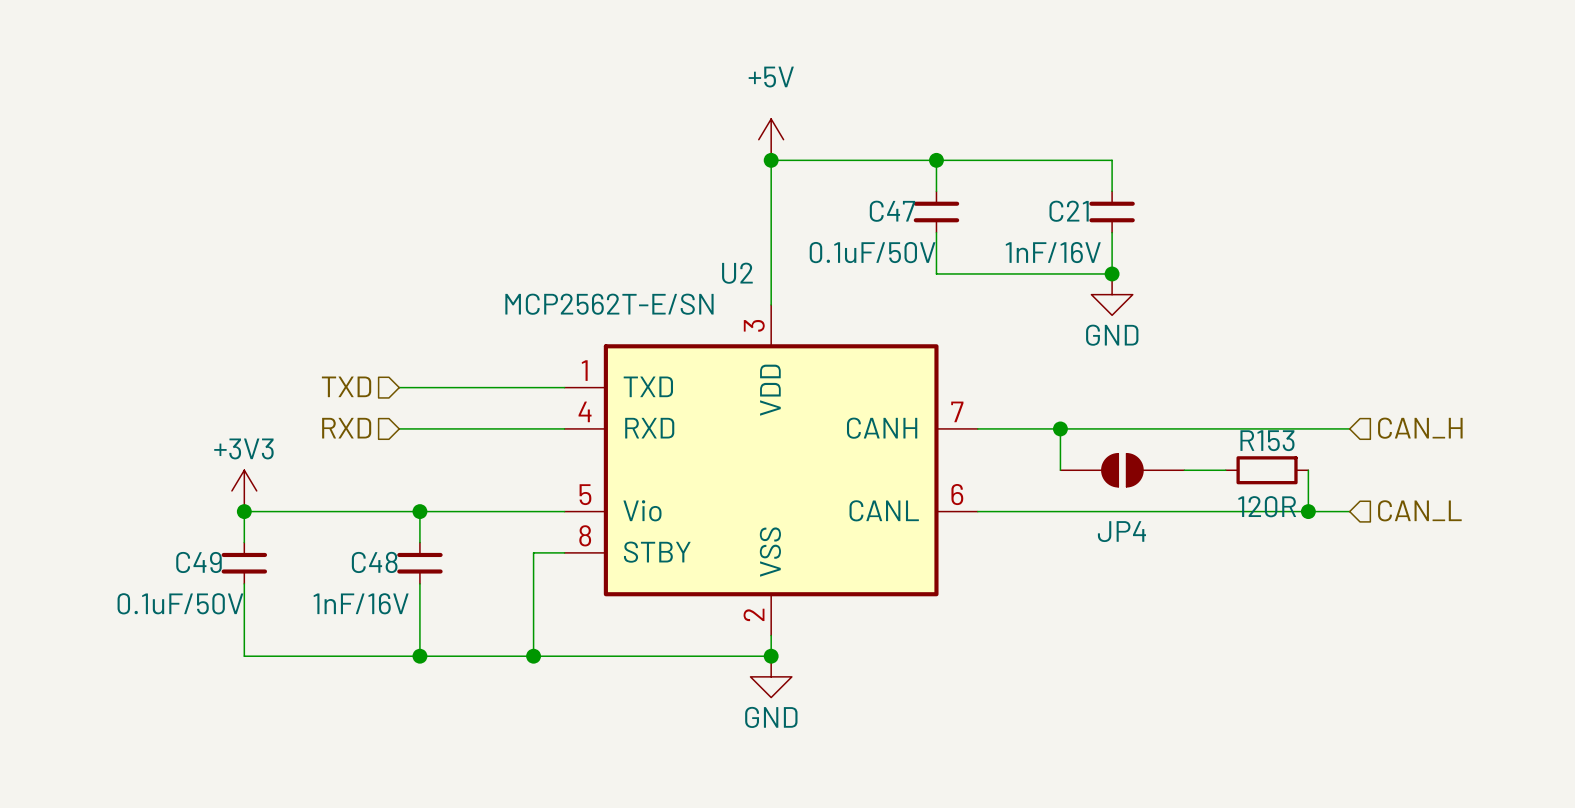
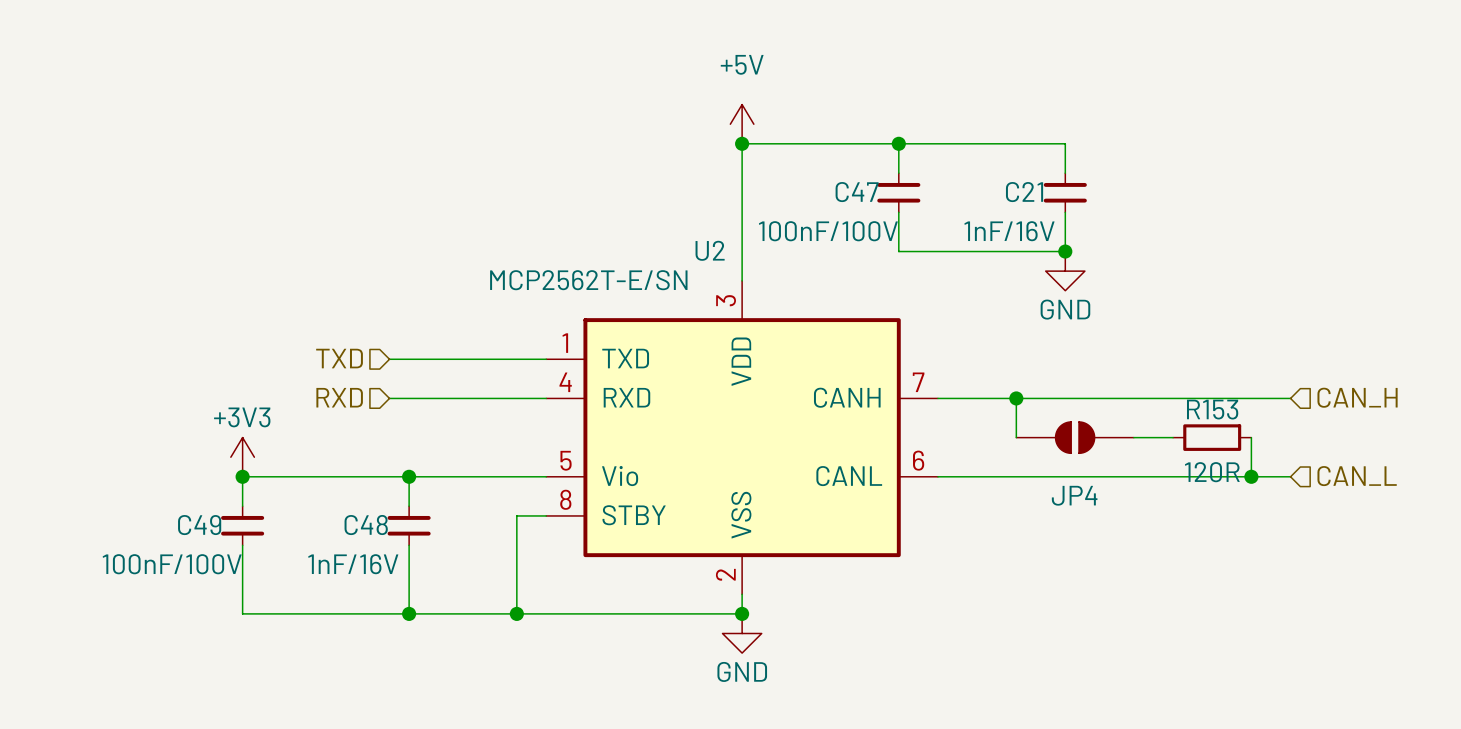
C47 value: 0.1uF/50V (872, 252) -> 100nF/100V (828, 231)
C49 value: 0.1uF/50V (180, 603) -> 100nF/100V (172, 564)

